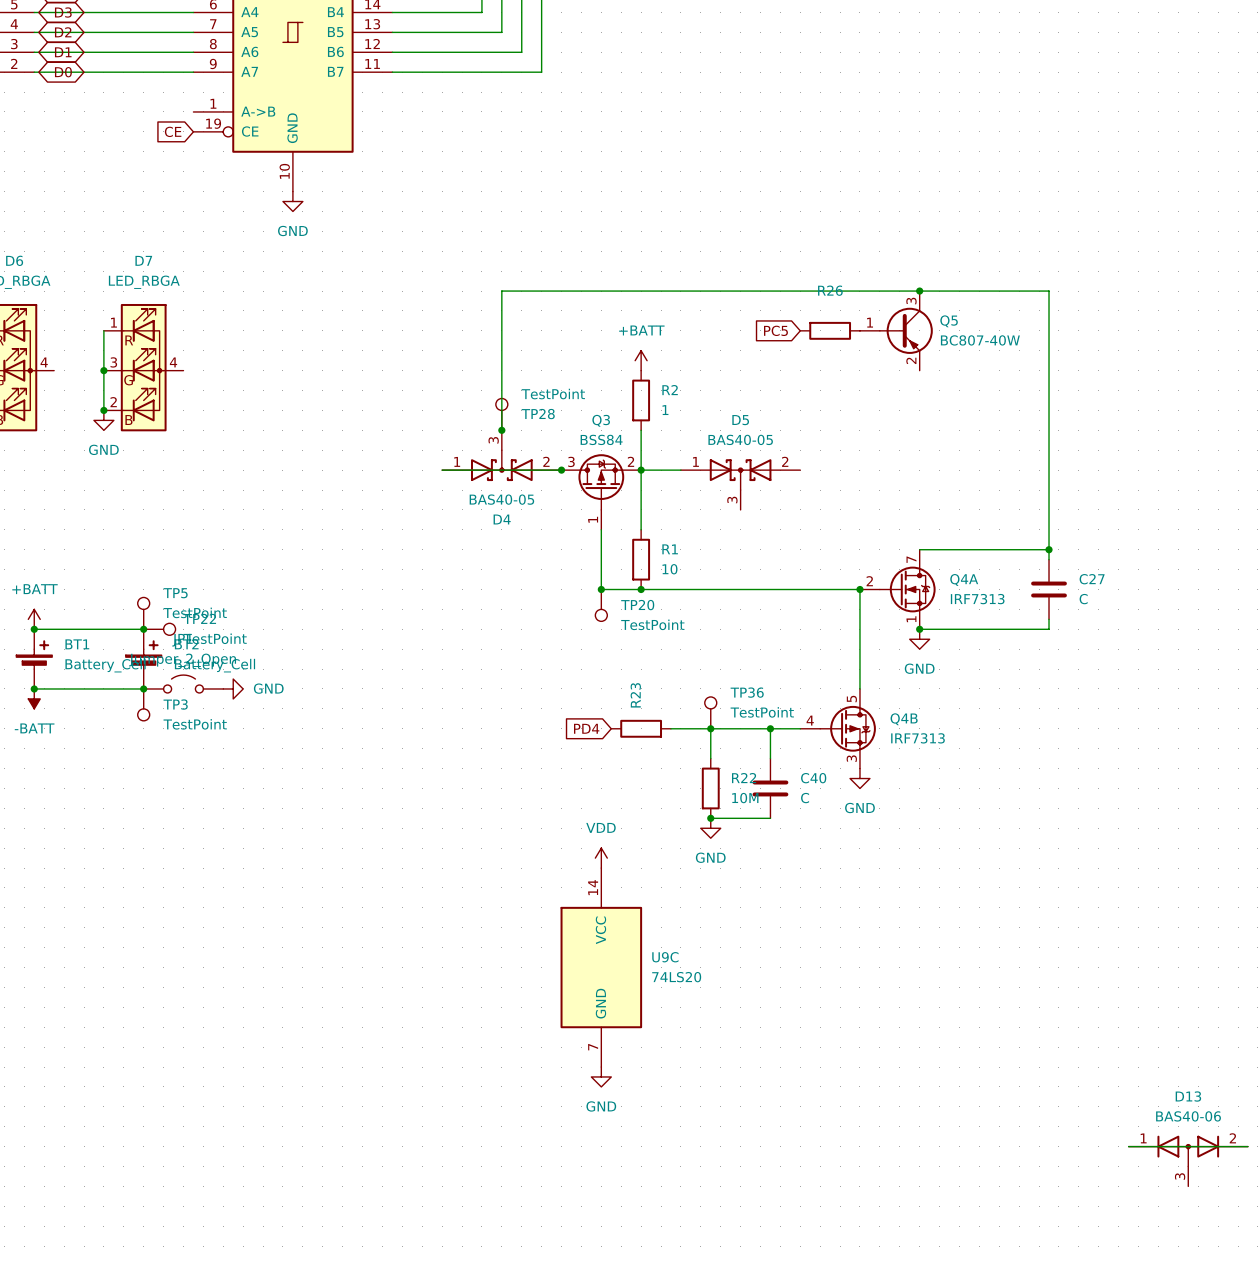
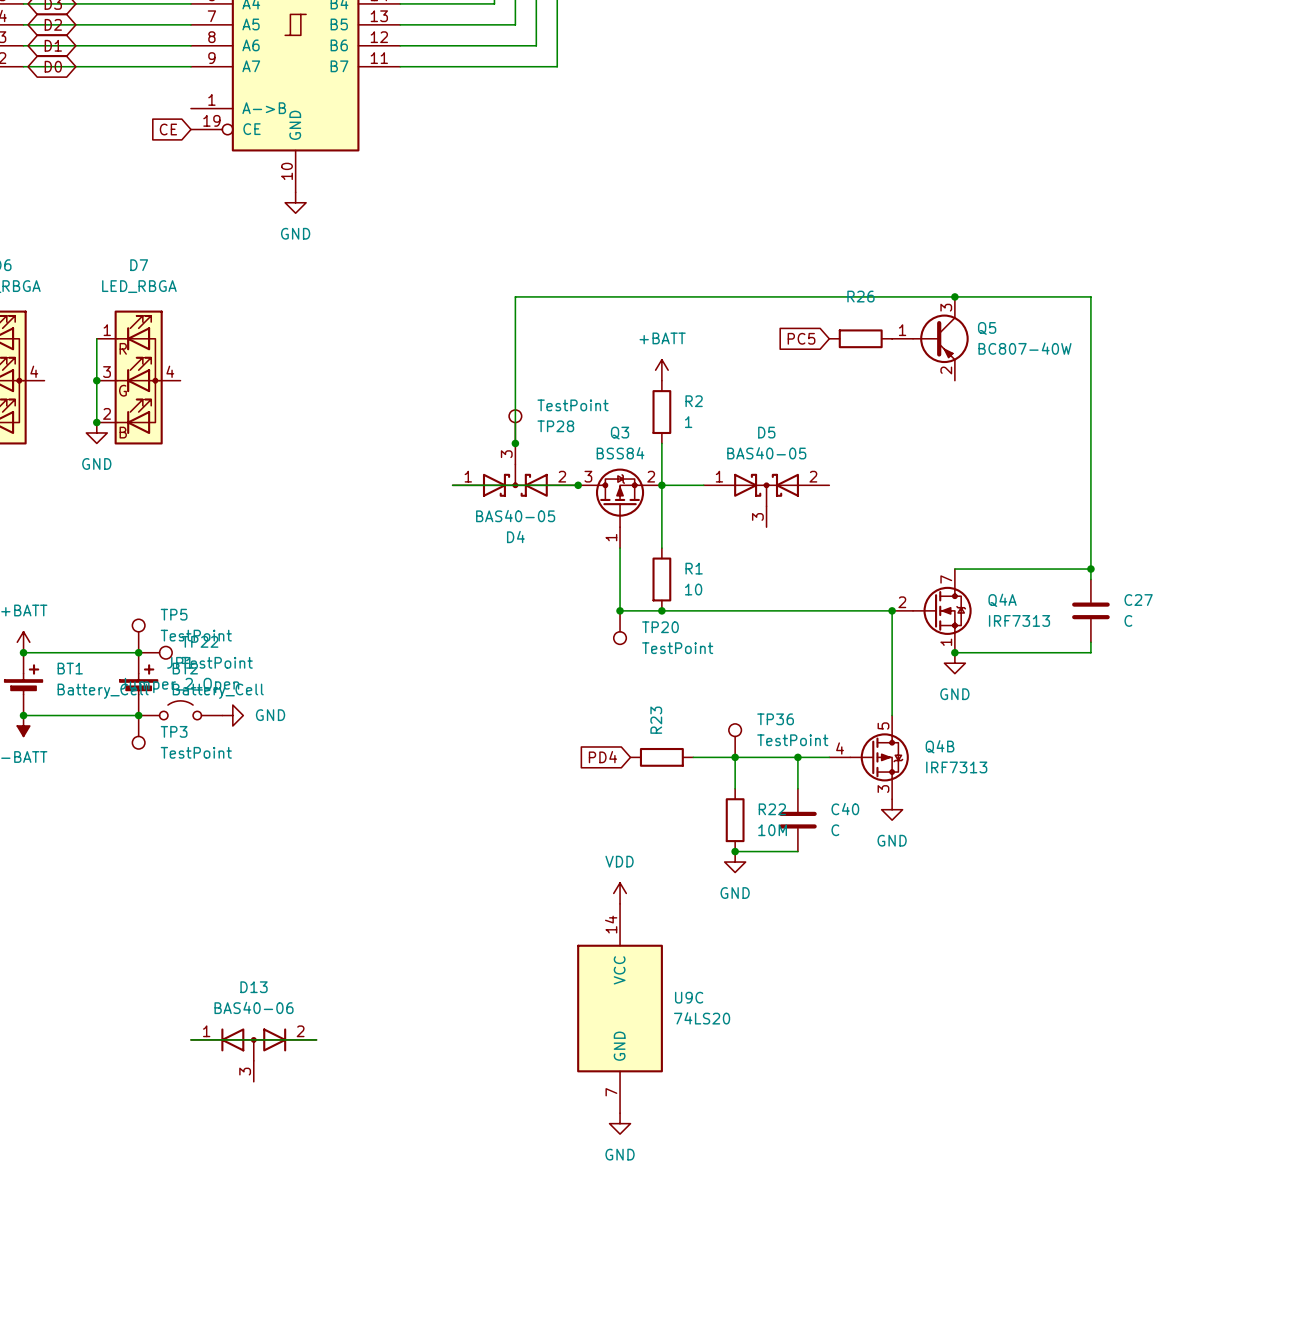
wire: none -> (190, 1039) (316, 1039)
wire: (1128, 1146) (1247, 1146) -> none
D13 position: (1188, 1161) -> (253, 1055)

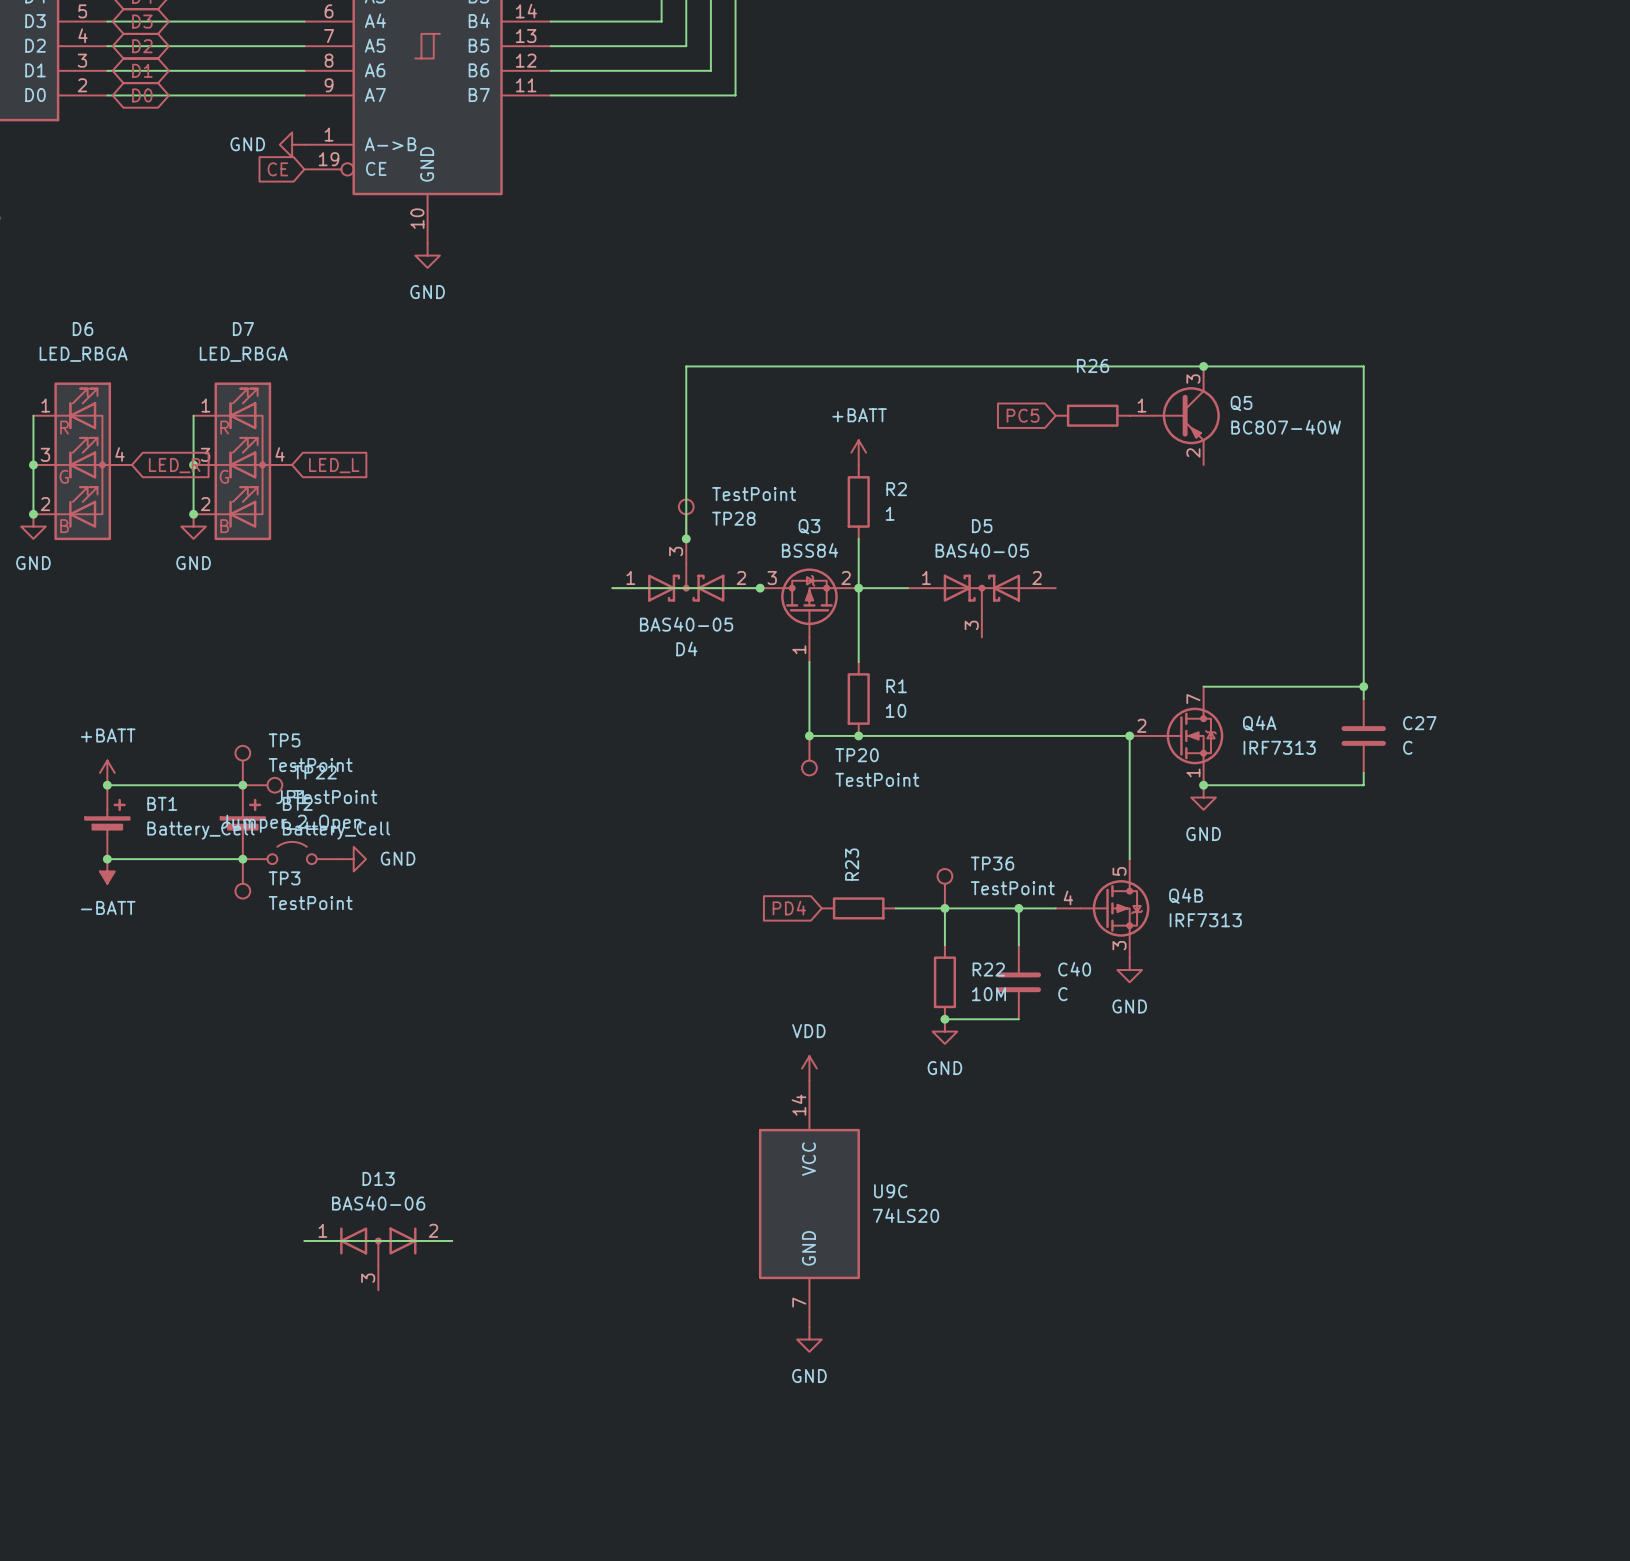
power symbol: none -> GND (292, 144)
global label: none -> LED_R (174, 465)
global label: none -> LED_L (334, 465)

